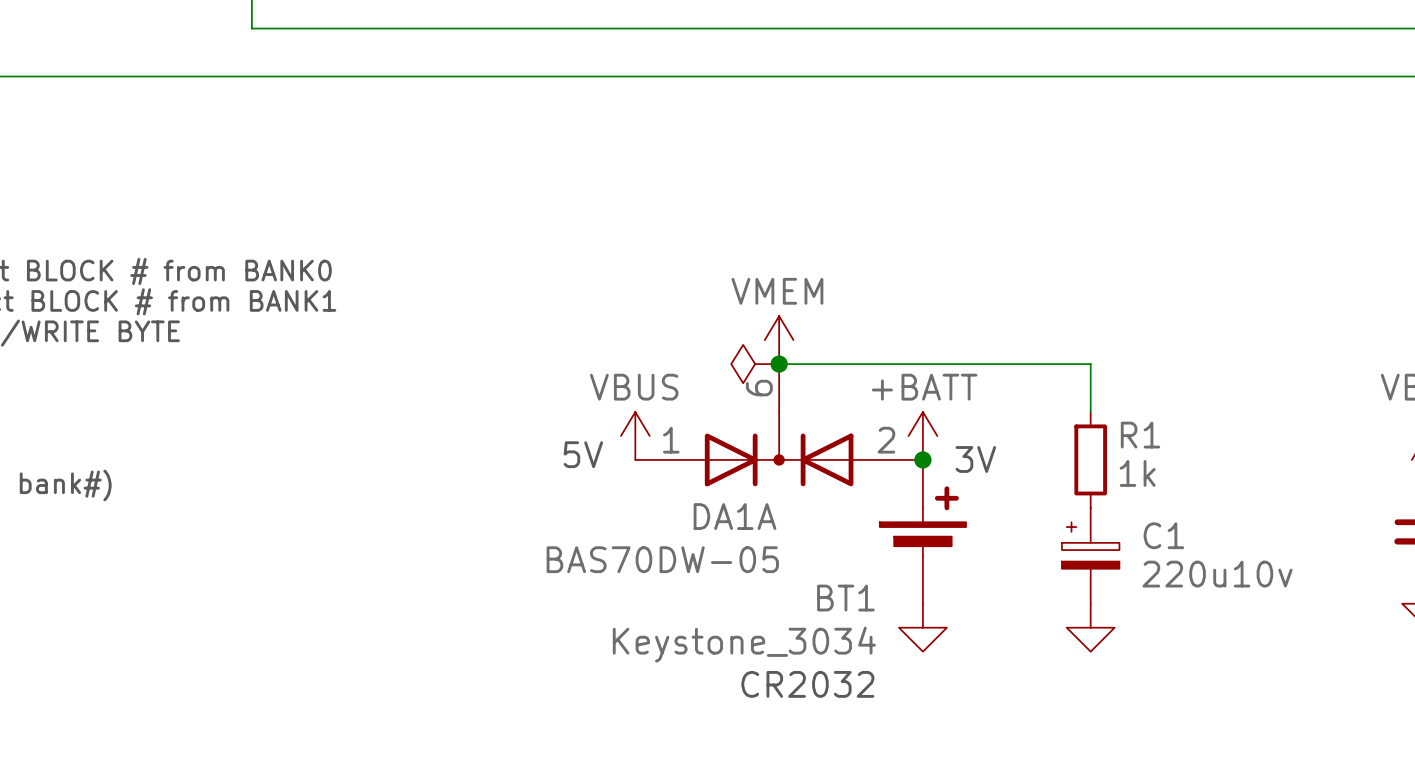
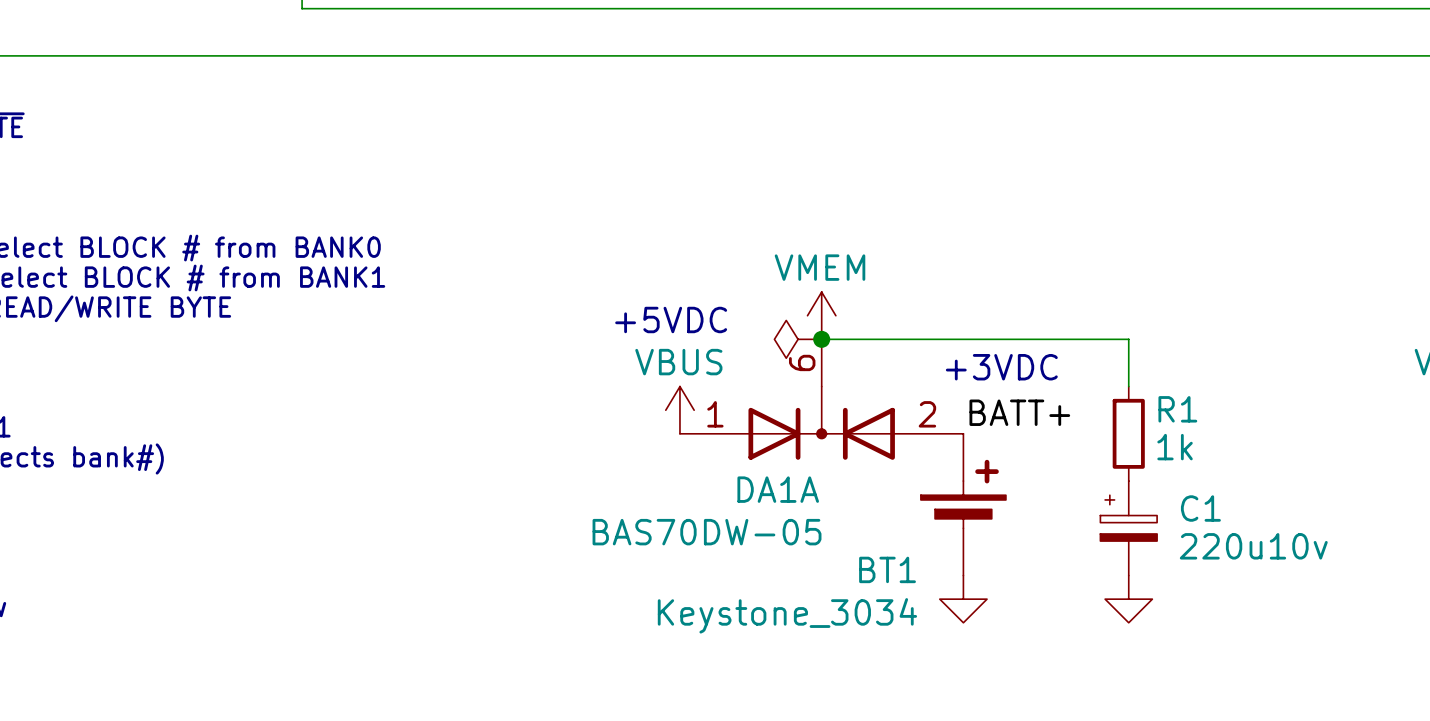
text: none -> +5VDC (671, 319)
text: none -> +3VDC (1001, 367)
power symbol: +BATT (922, 435) -> none
label: none -> BATT+ (1019, 412)
text: 5V (583, 454) -> none
junction: (922, 459) -> none
text: 3V (975, 459) -> none
text: CR2032 (807, 684) -> none

